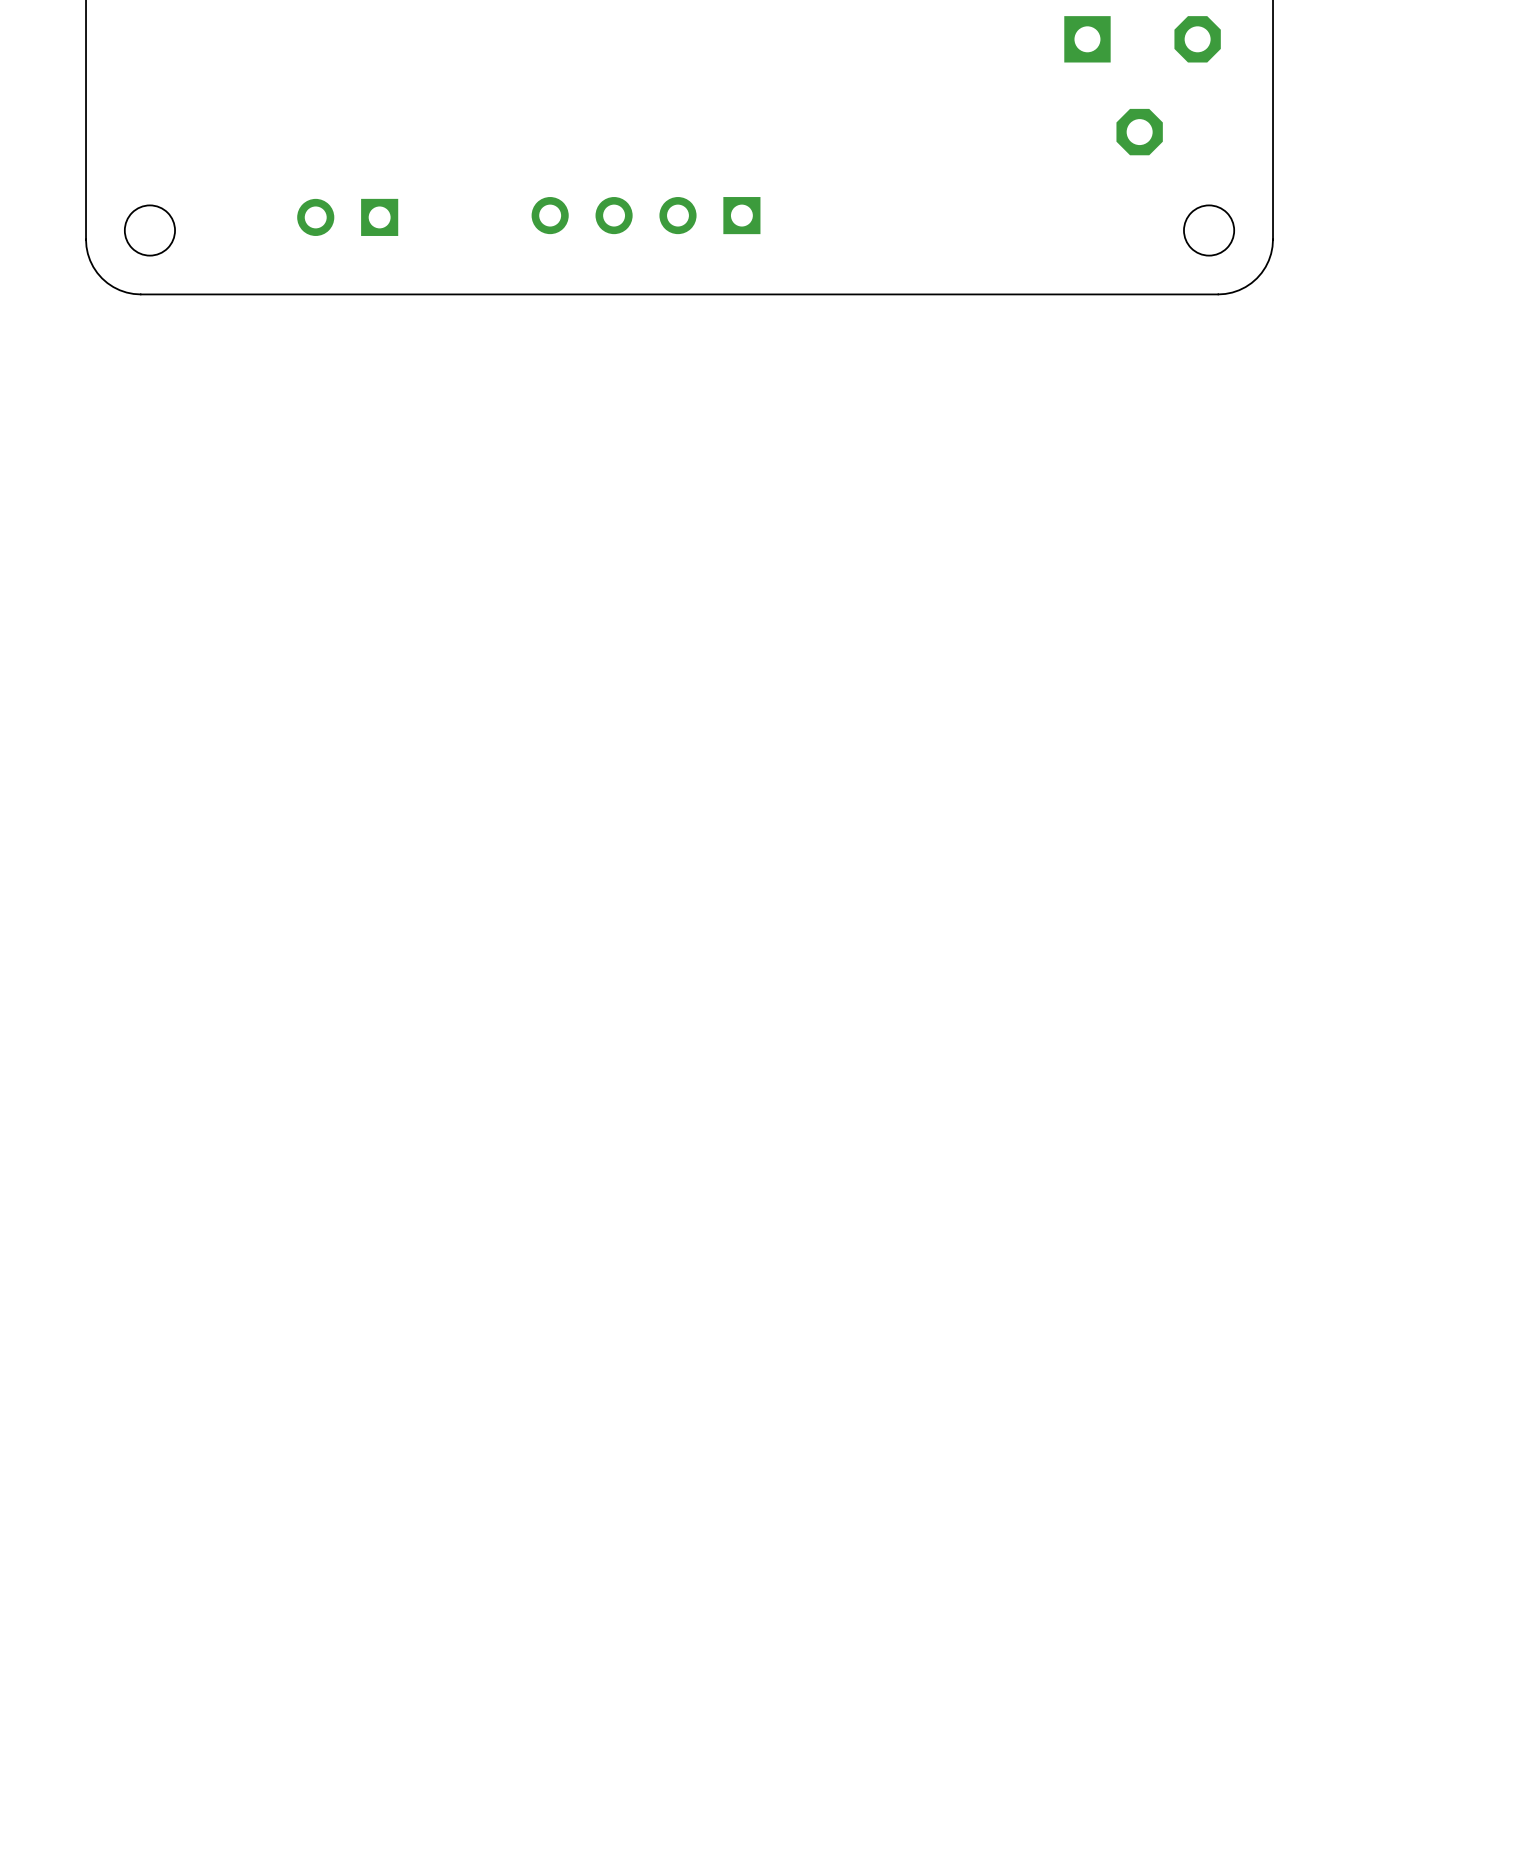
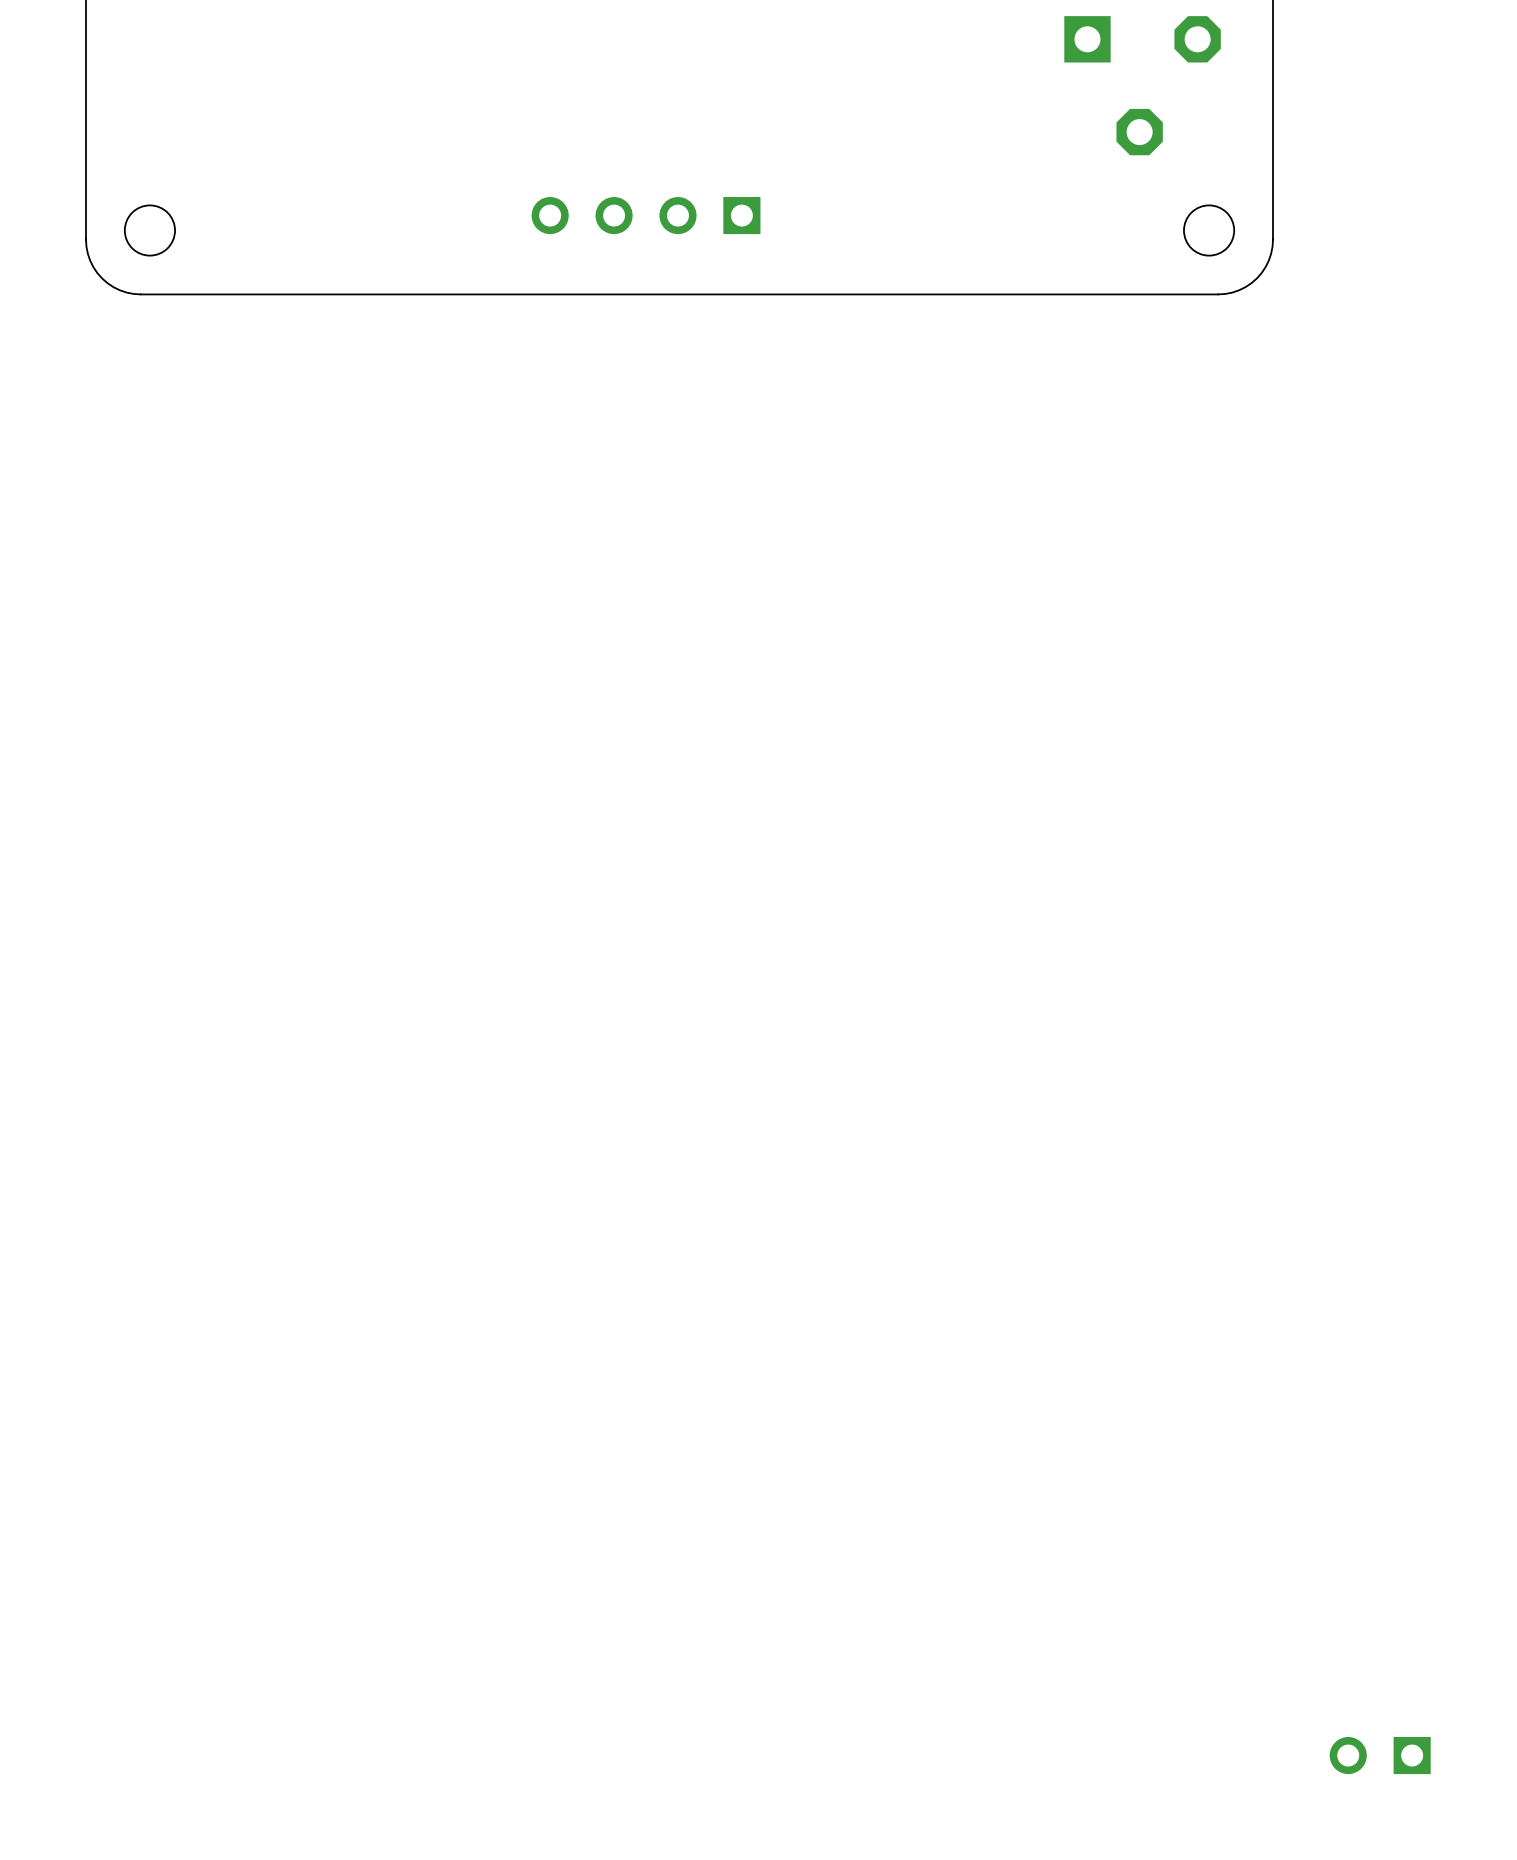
part: (347, 217) -> none
part: none -> (1380, 1755)

